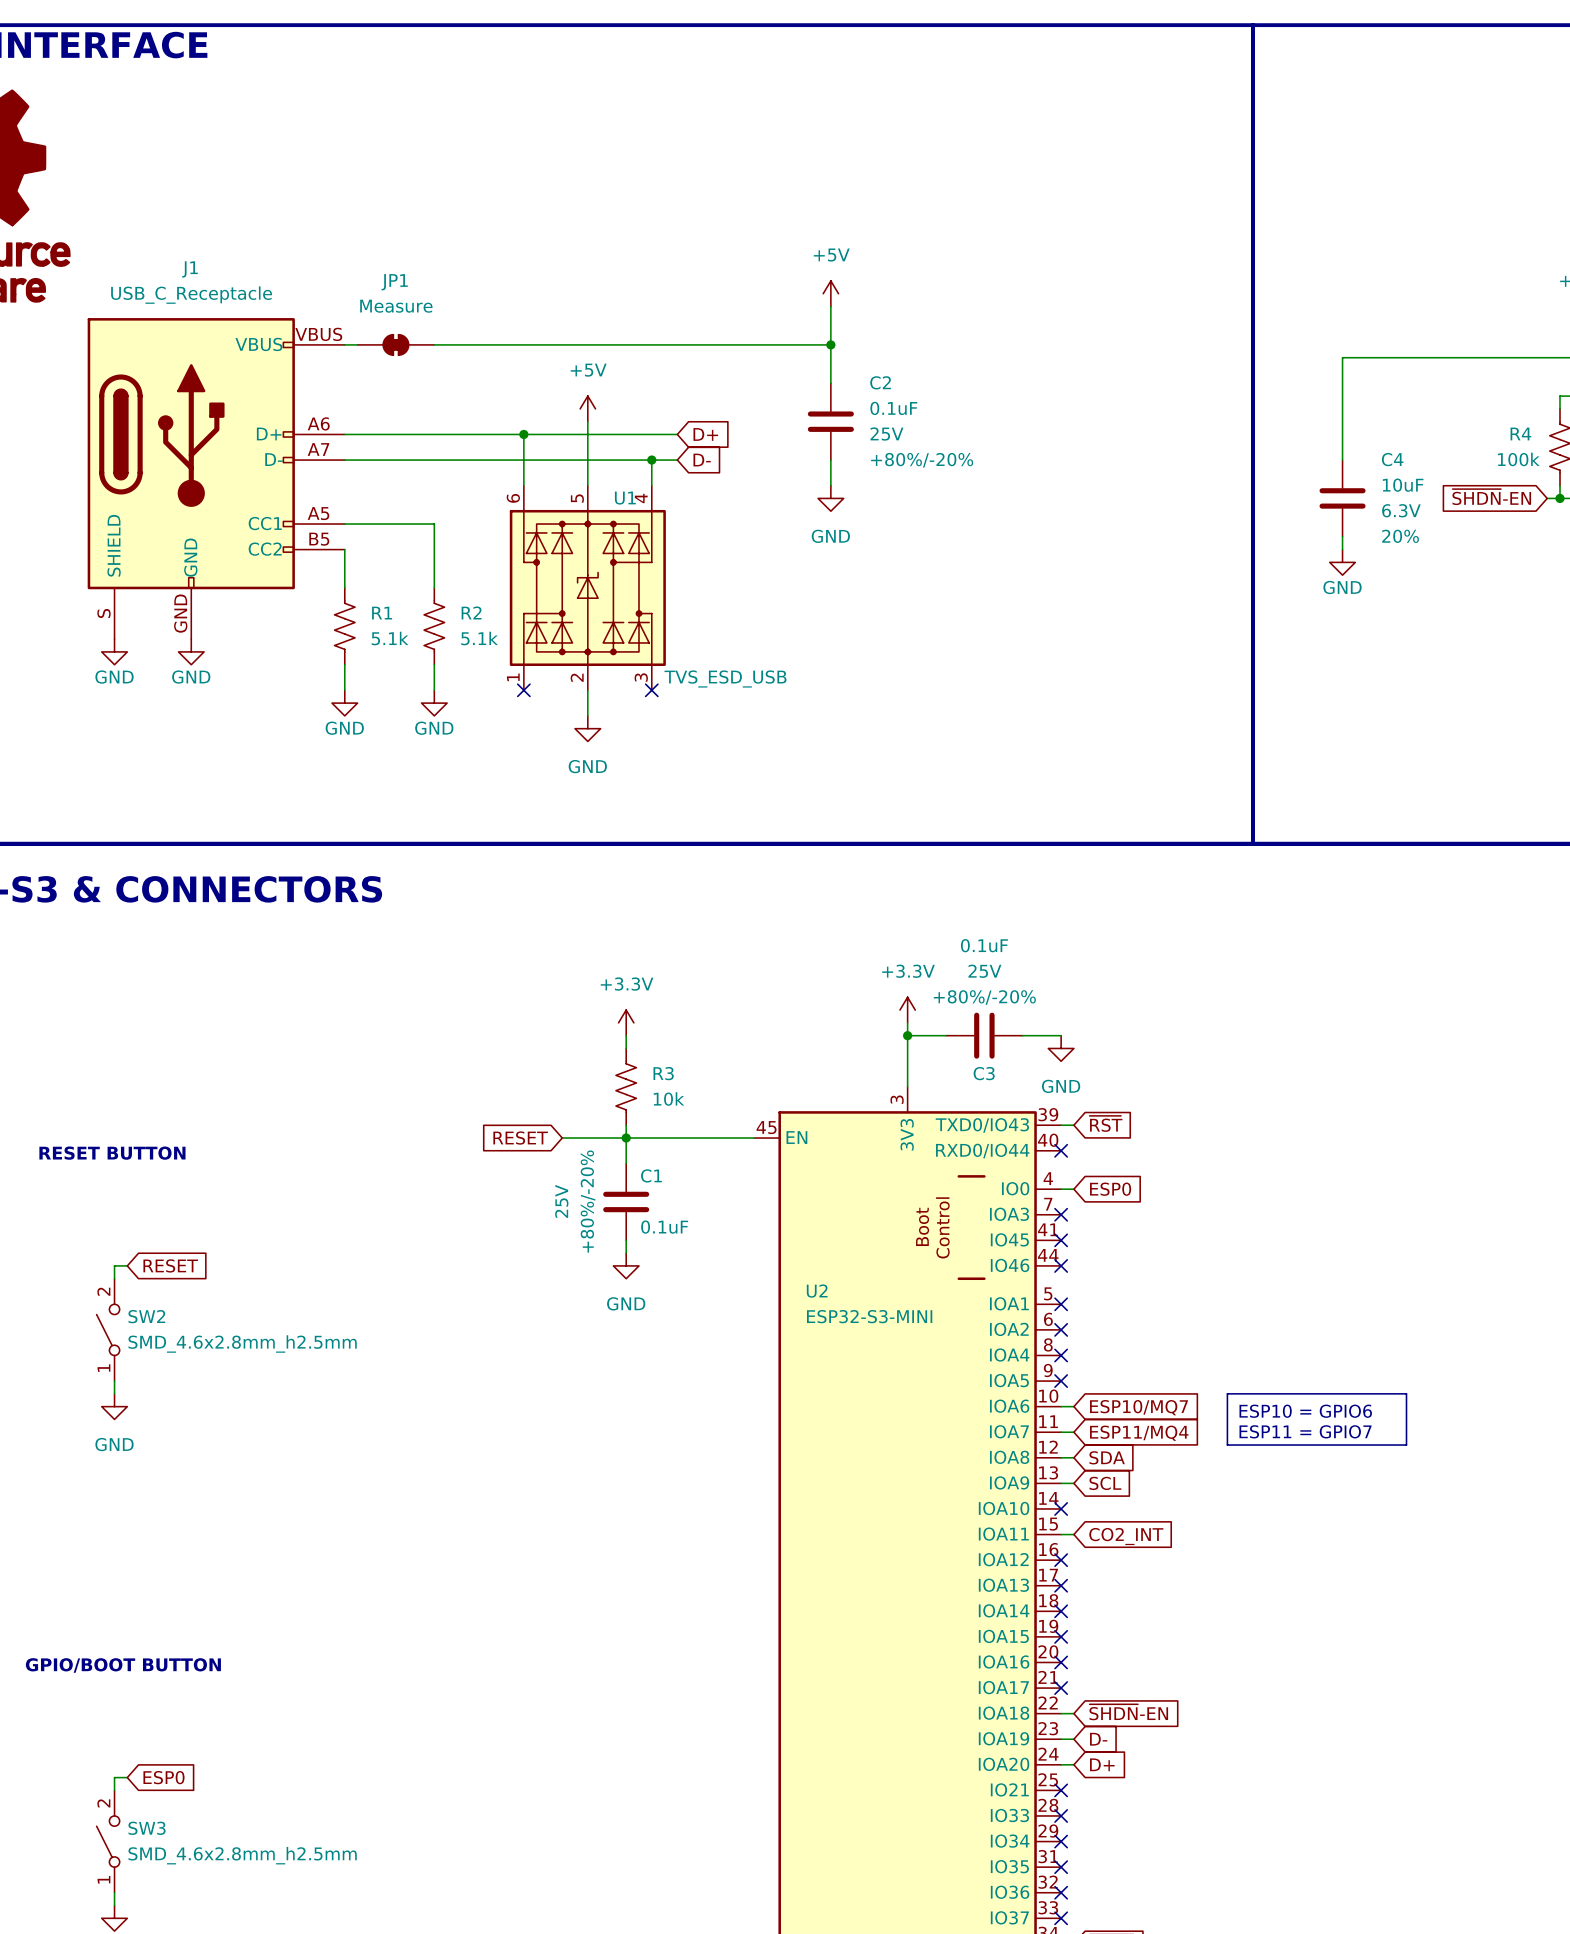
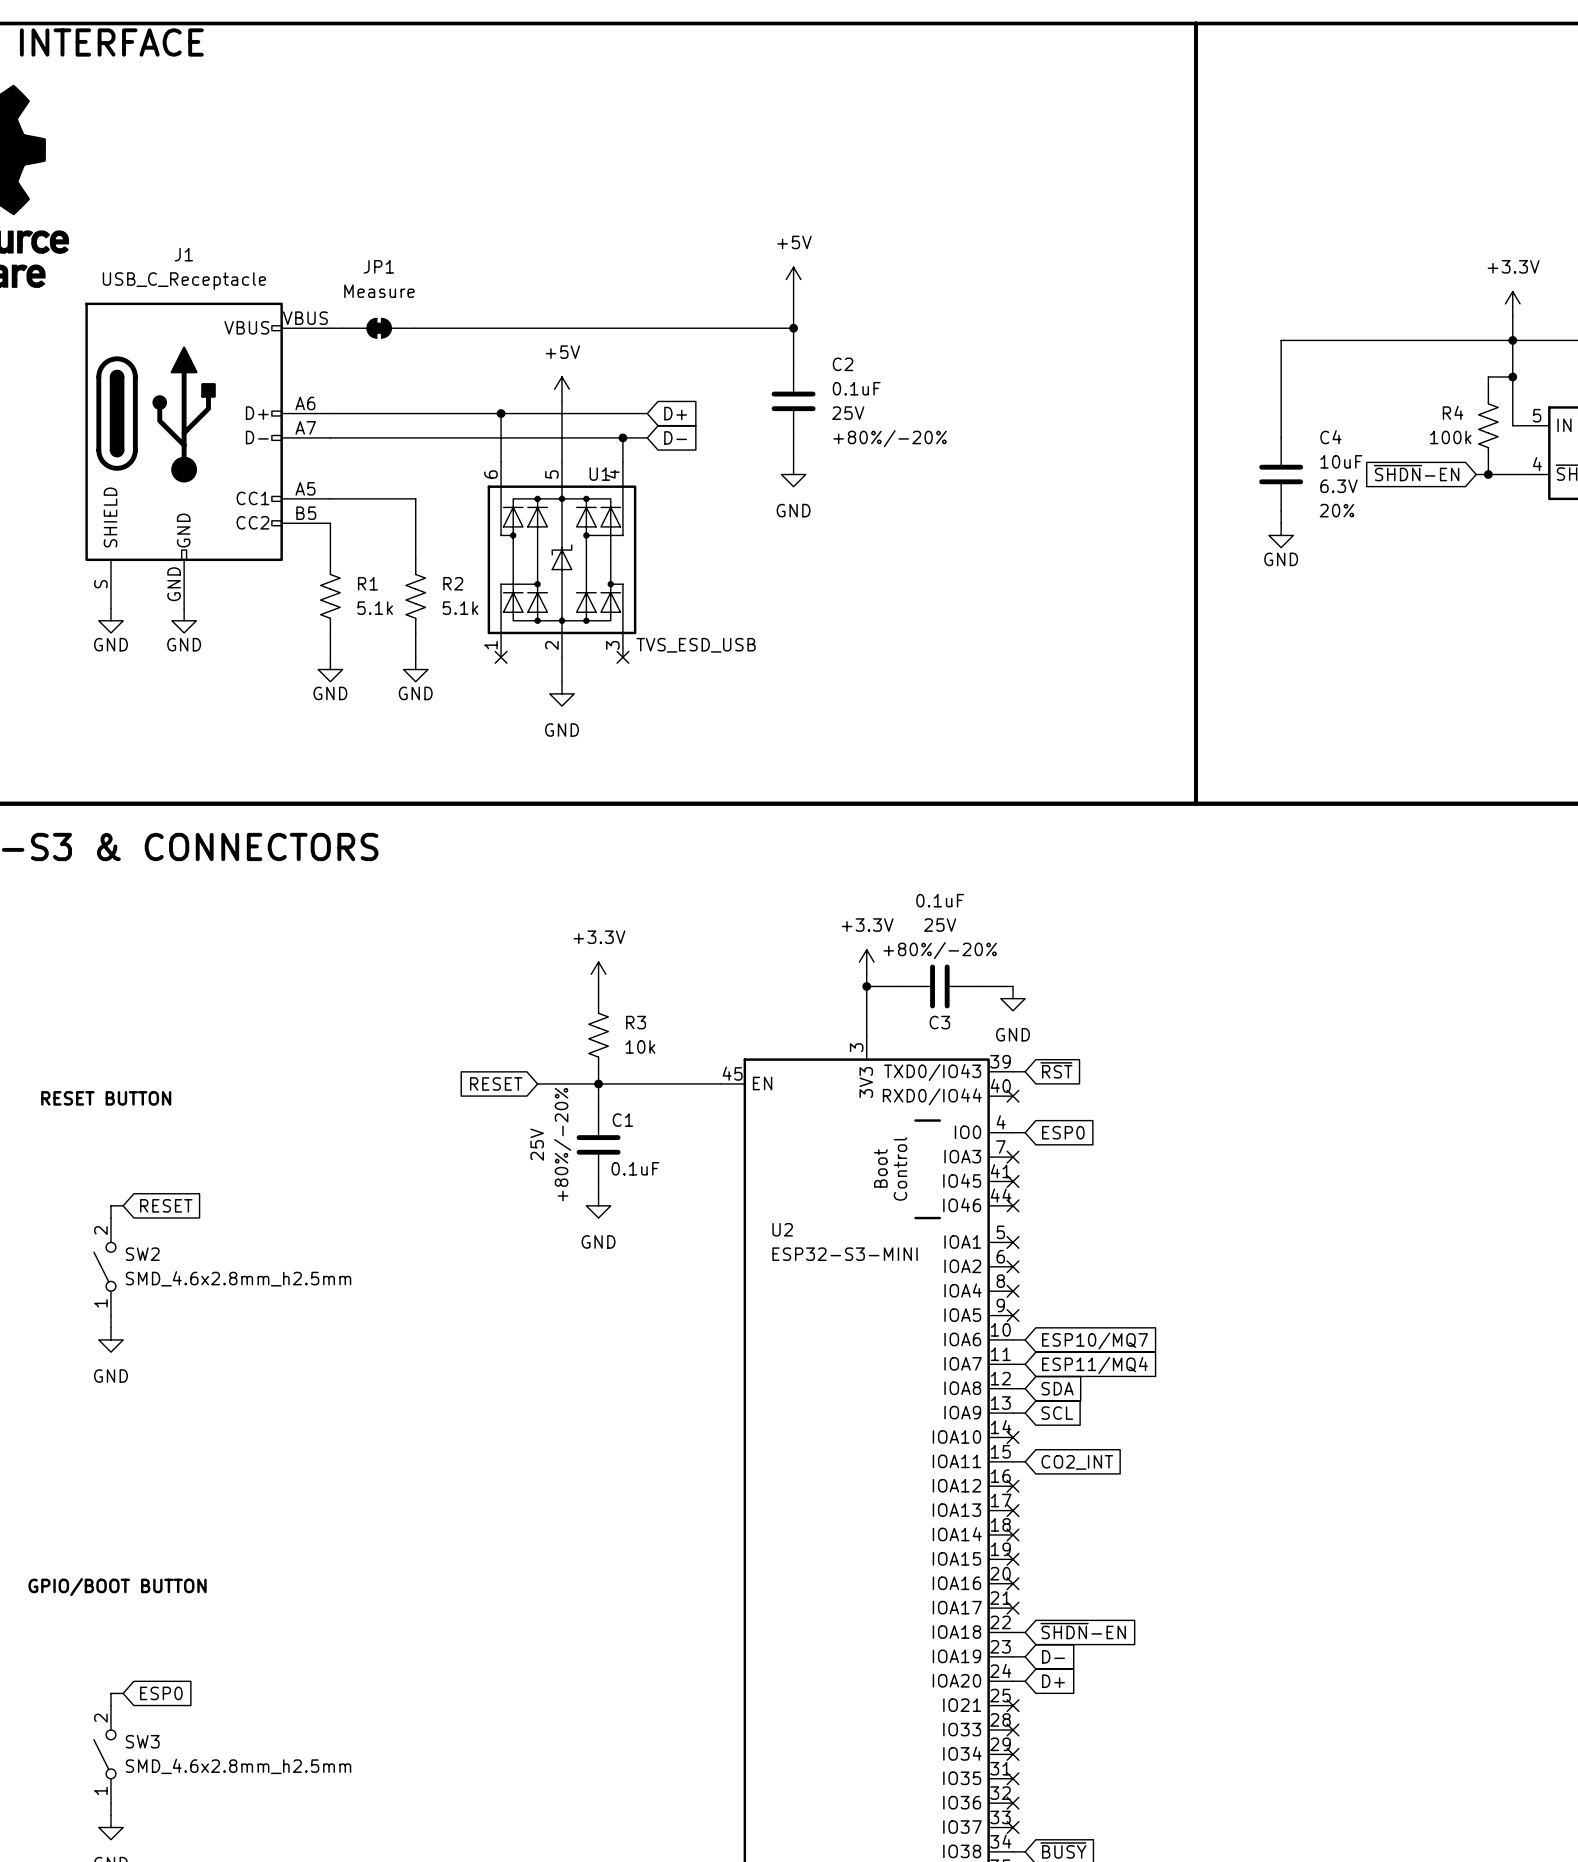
line: (1227, 1393) (1406, 1393) (1406, 1445) (1227, 1445) (1227, 1393) -> none
text: ESP10 = GPIO6 (1305, 1411) -> none
text: ESP11 = GPIO7 (1305, 1431) -> none

